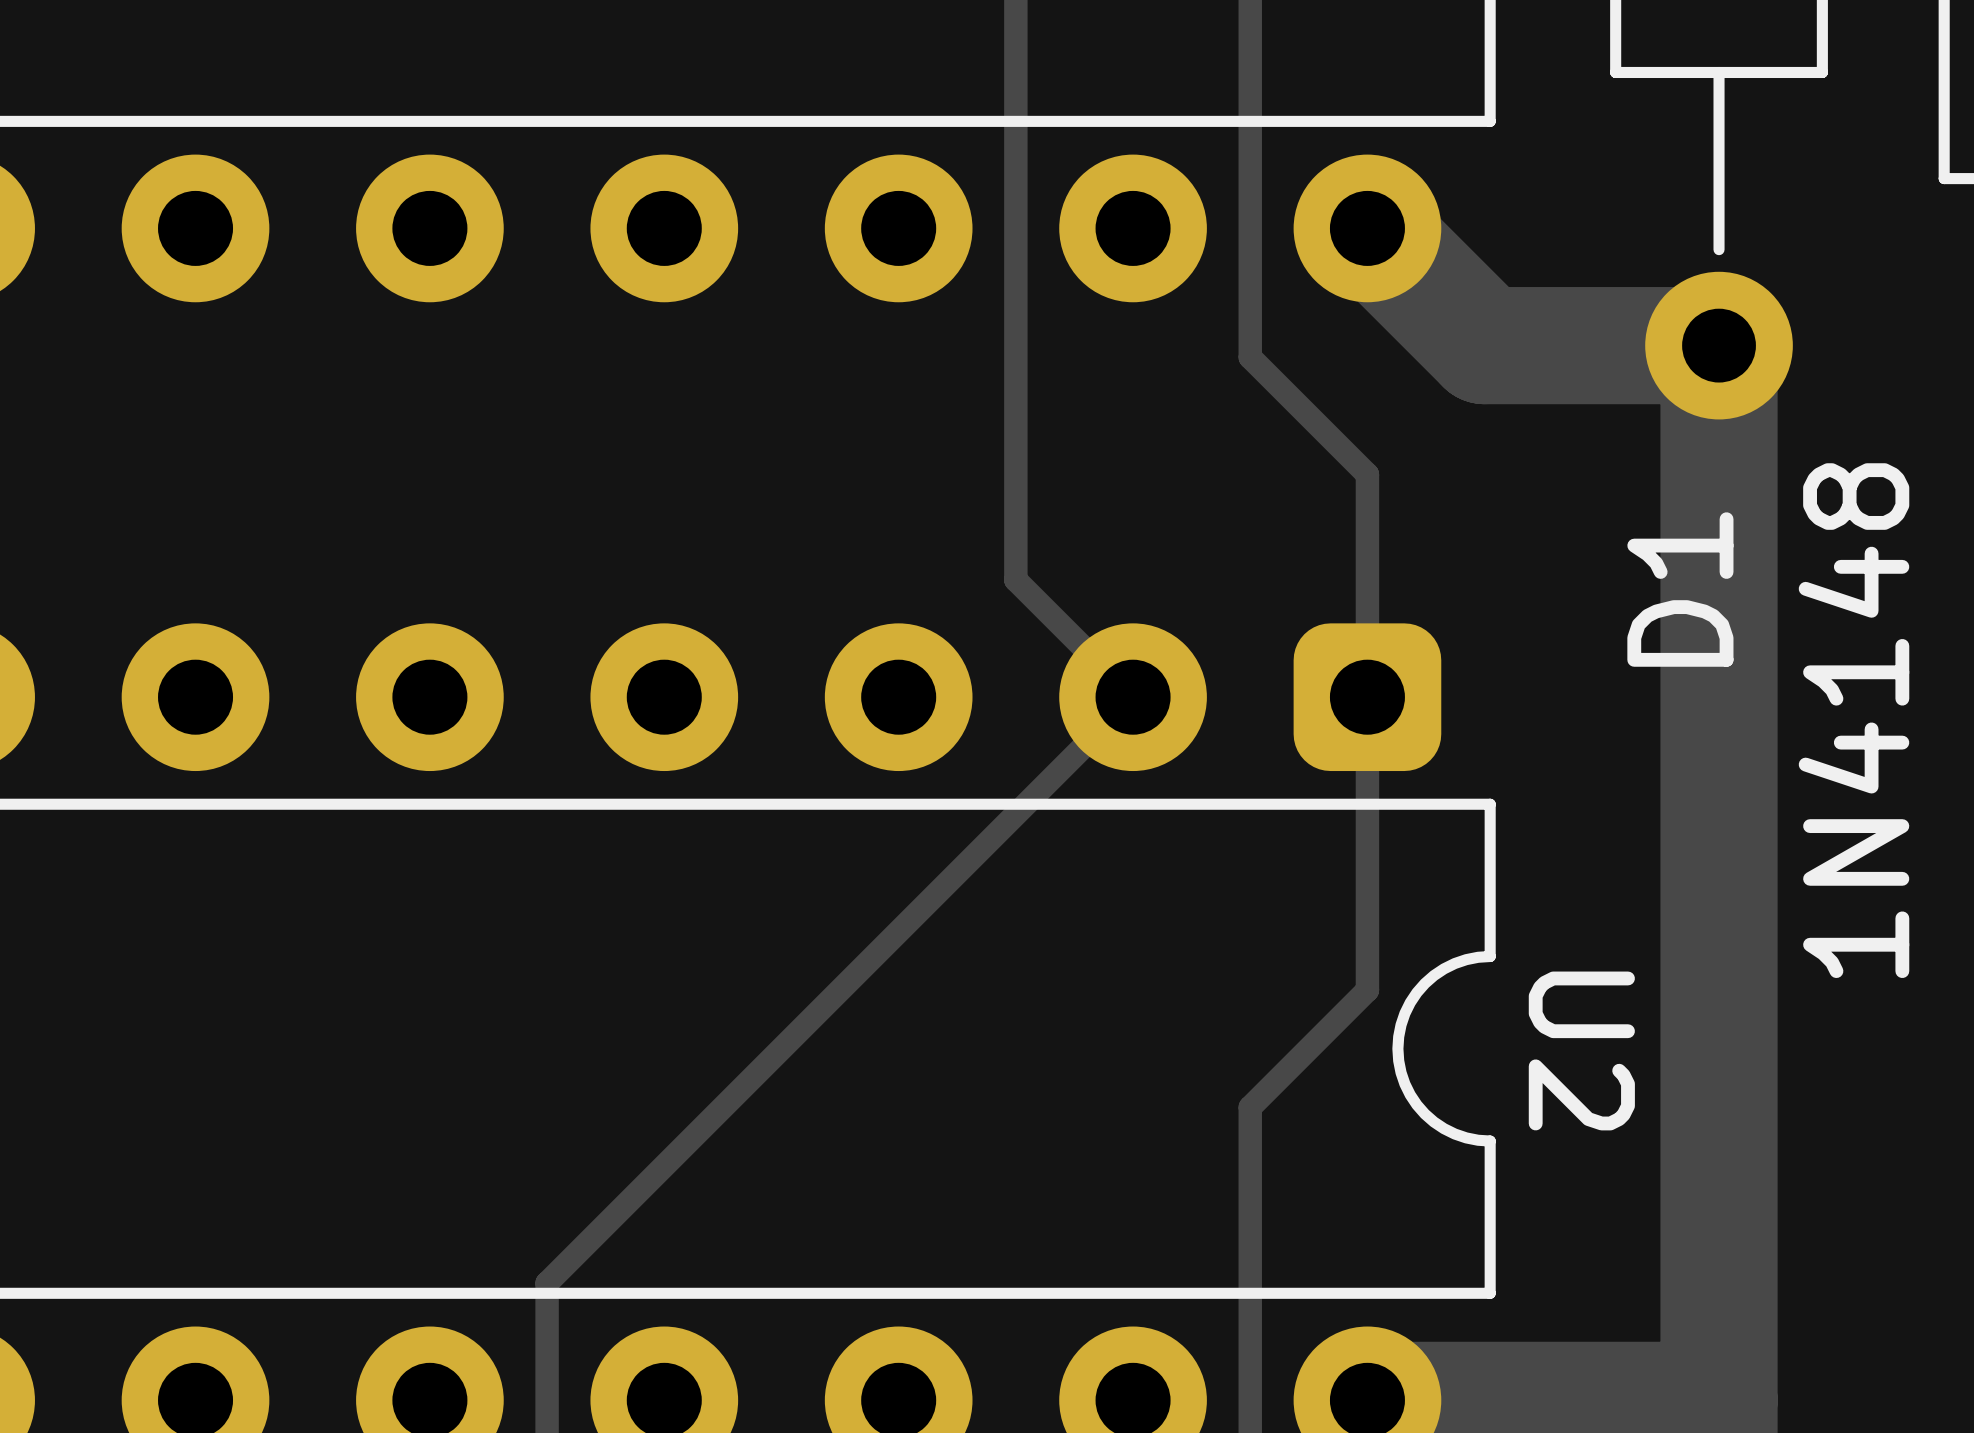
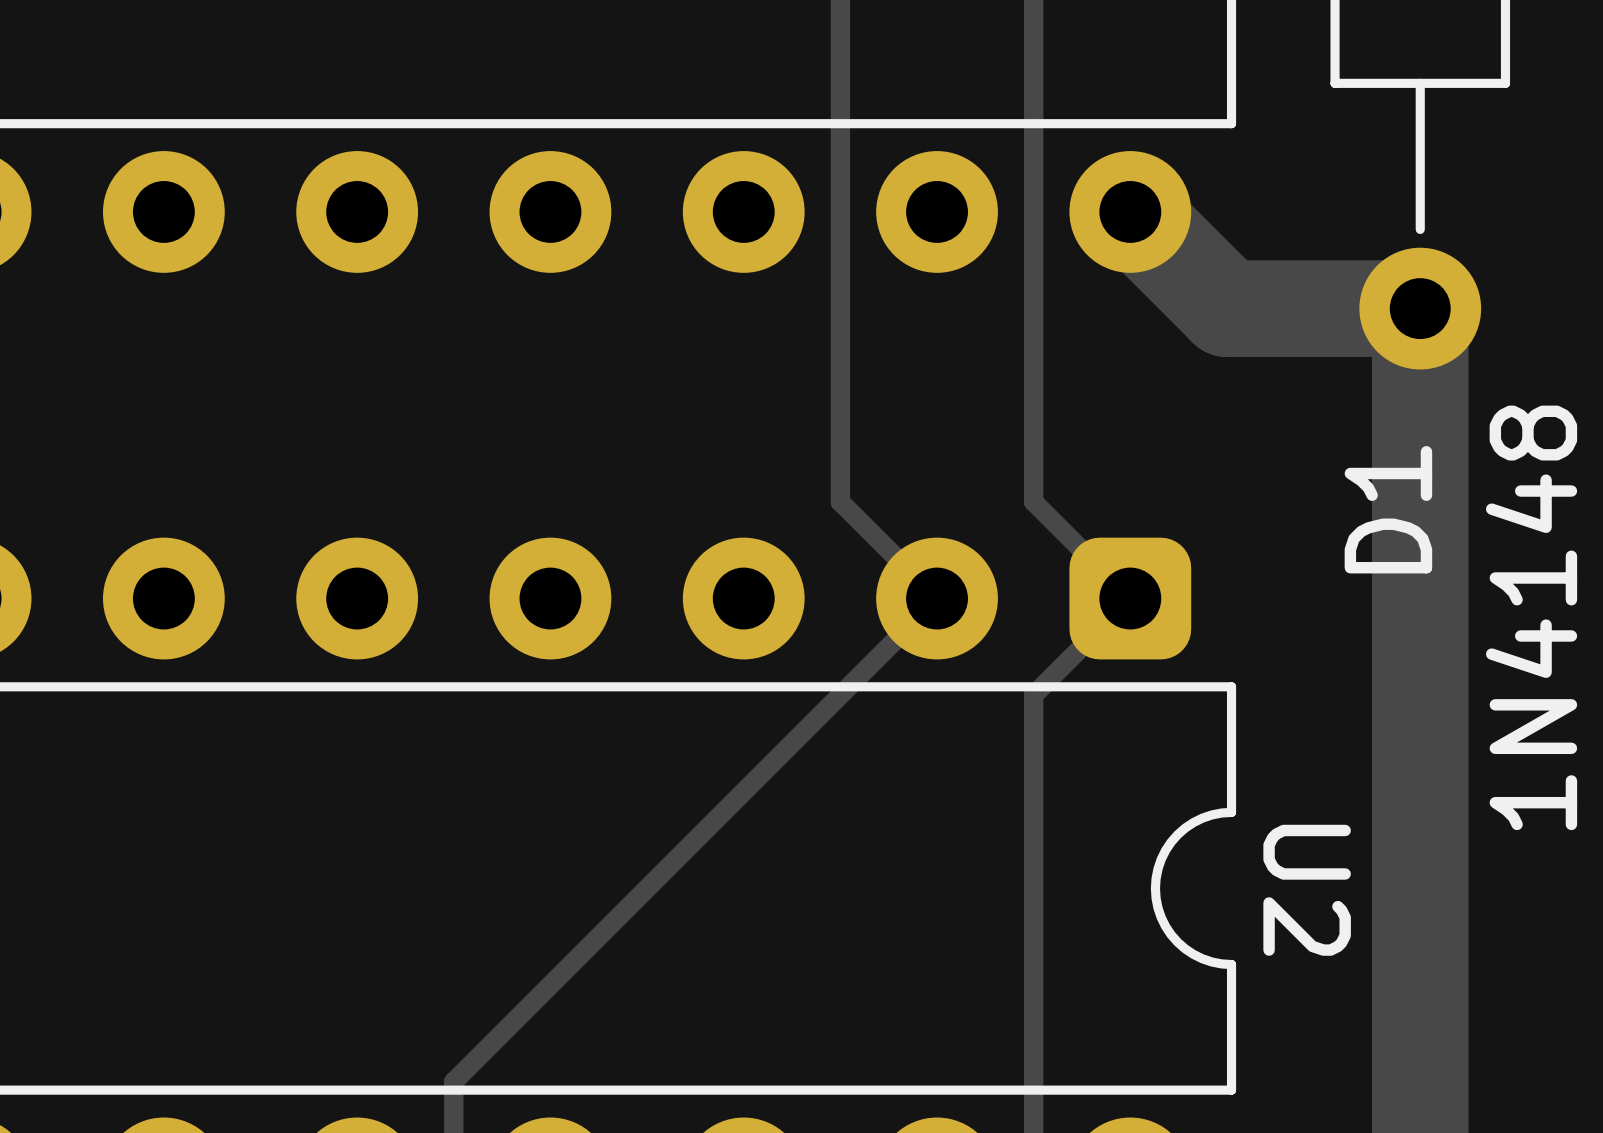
track: (1250, 357) (1367, 474) (1367, 990) (1250, 1107) -> (1033, 318) (1033, 501) (1130, 598) (1033, 695) (1033, 936)

